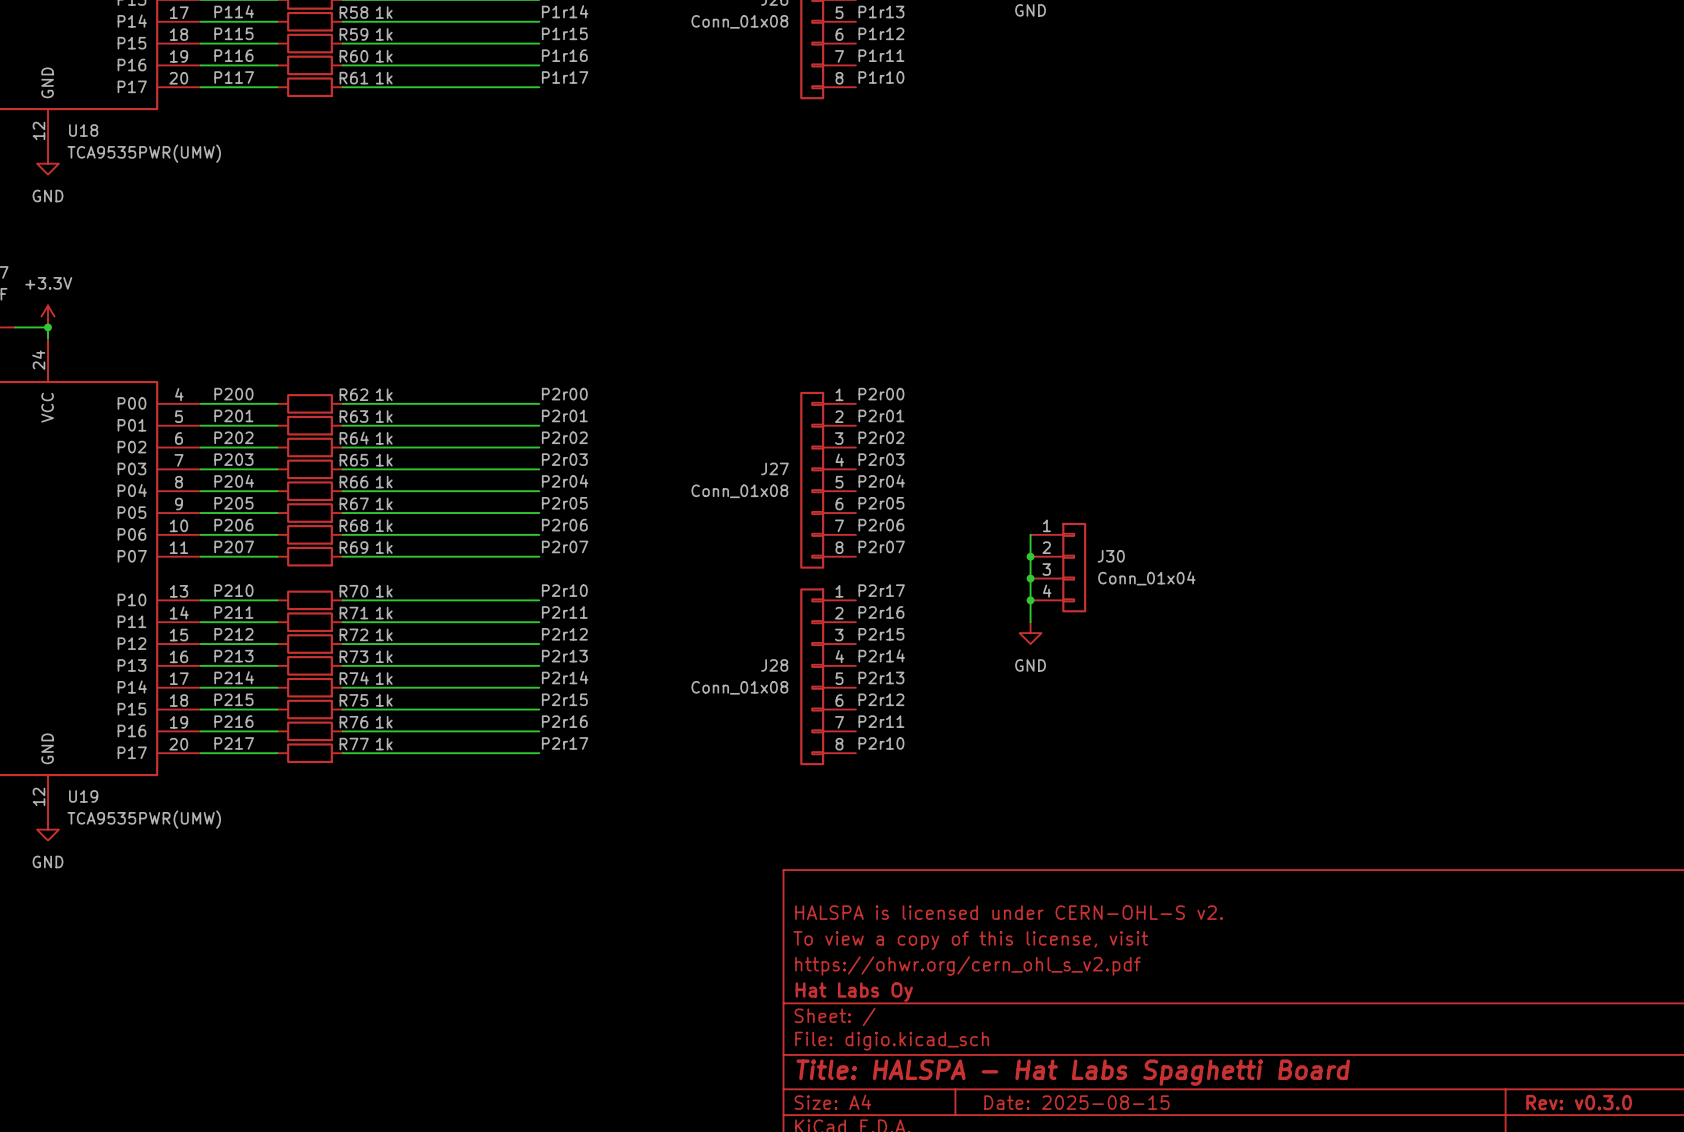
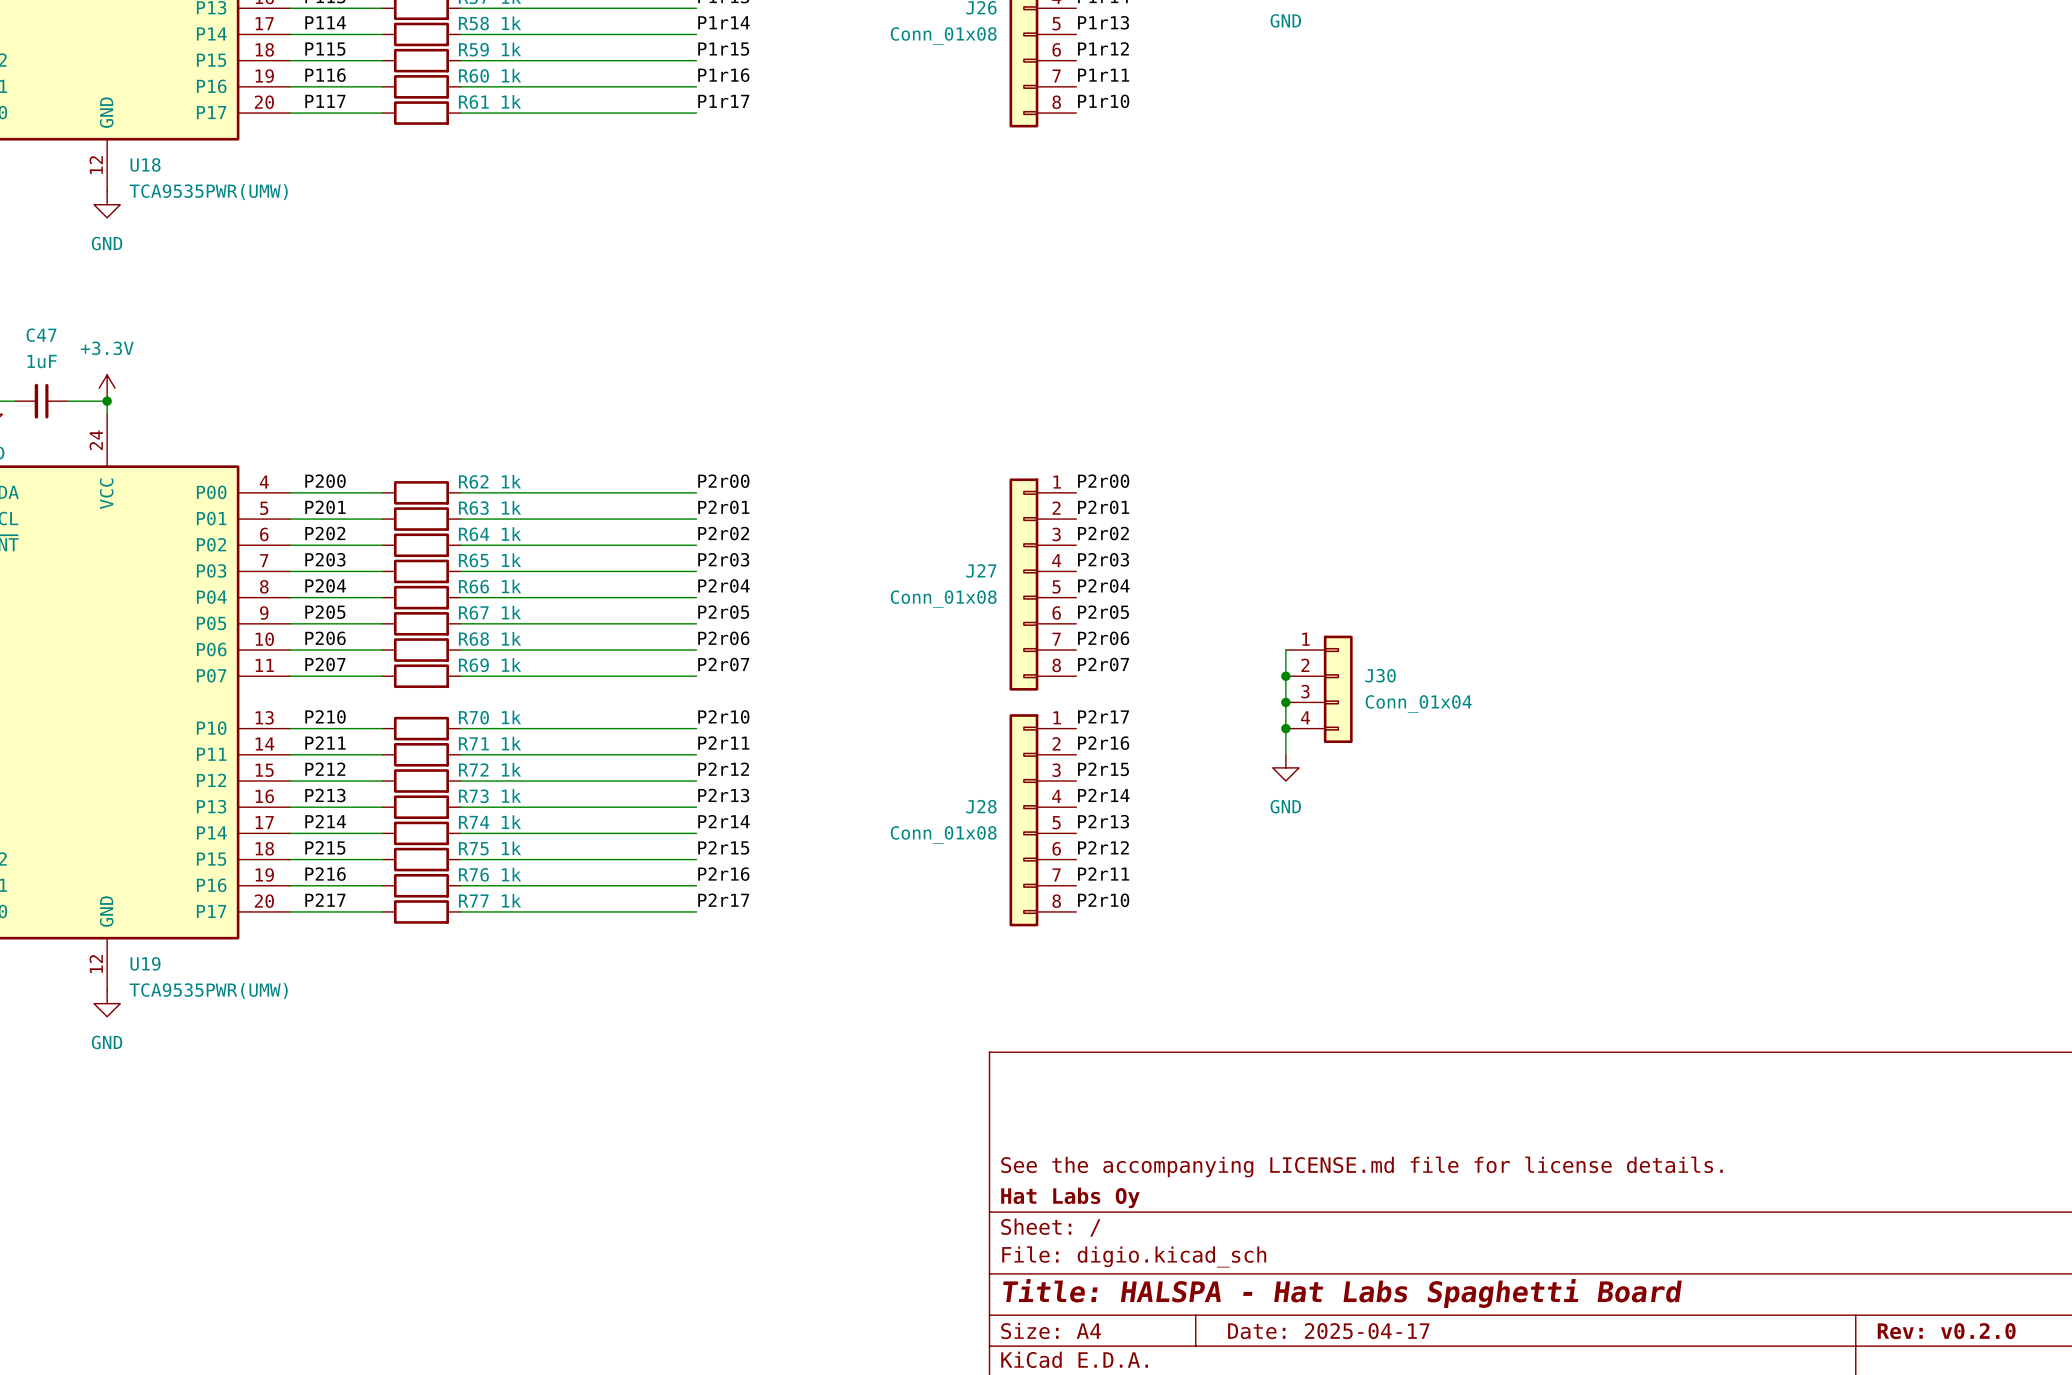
title block: HALSPA is licensed under CERN-OHL-S v2. (1009, 912) -> none
title block: To view a copy of this license, visit (970, 940) -> none
title block: https://ohwr.org/cern_ohl_s_v2.pdf (967, 966) -> See the accompanying LICENSE.md file for license details. (1362, 1166)
title block: Date: 2025-08-15 (1076, 1102) -> Date: 2025-04-17 (1328, 1331)
title block: Rev: v0.3.0 (1579, 1102) -> Rev: v0.2.0 (1946, 1331)

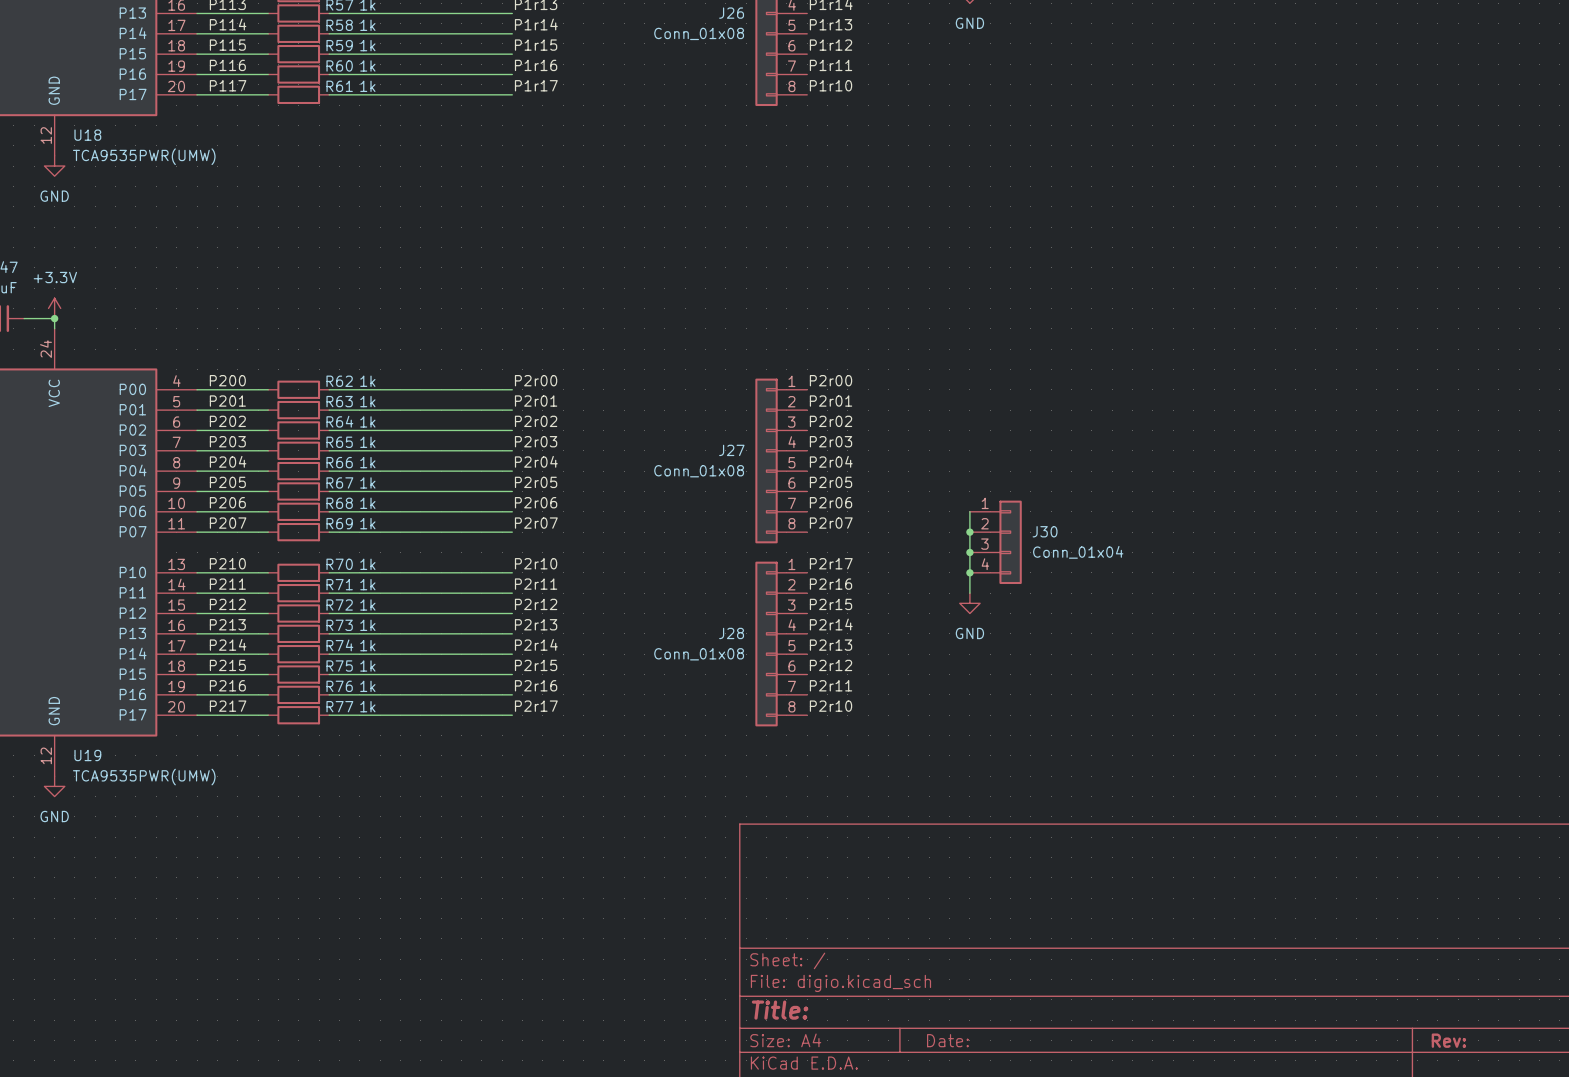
title block: See the accompanying LICENSE.md file for license details. (1362, 1166) -> none
title block: Hat Labs Oy (1070, 1197) -> none
title block: Title: HALSPA - Hat Labs Spaghetti Board (1342, 1293) -> Title: (780, 1010)
title block: Date: 2025-04-17 (1328, 1331) -> Date: (947, 1040)
title block: Rev: v0.2.0 (1946, 1331) -> Rev: (1448, 1040)

